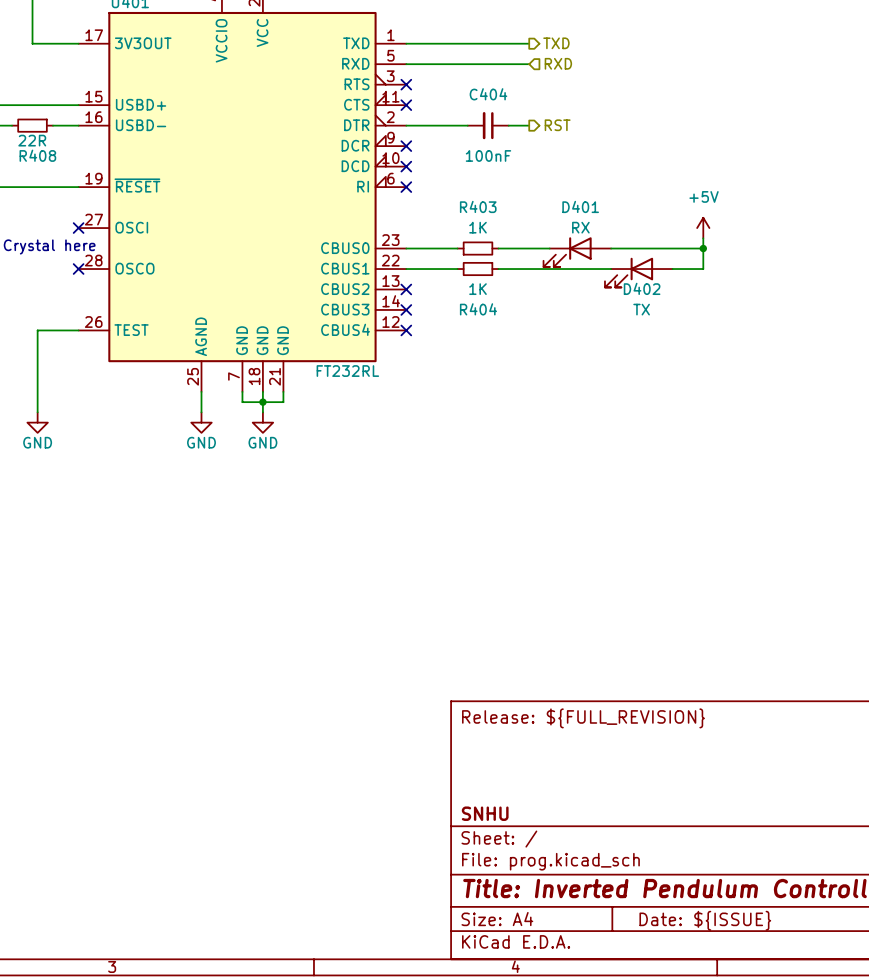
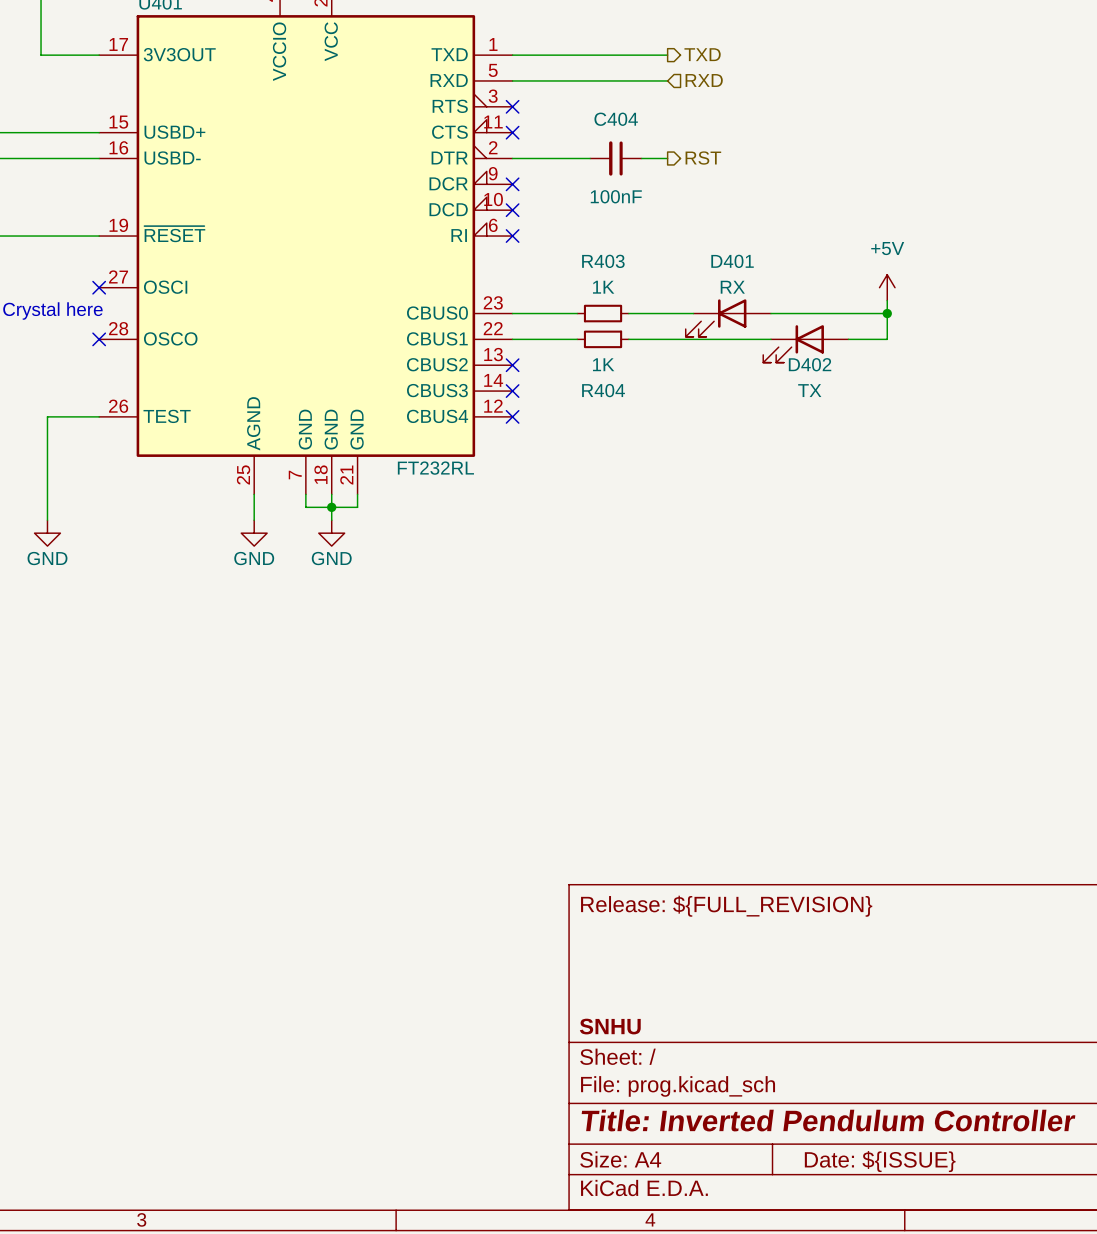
wire: none -> (15, 158) (66, 158)
R408: 22R (32, 125) -> none

